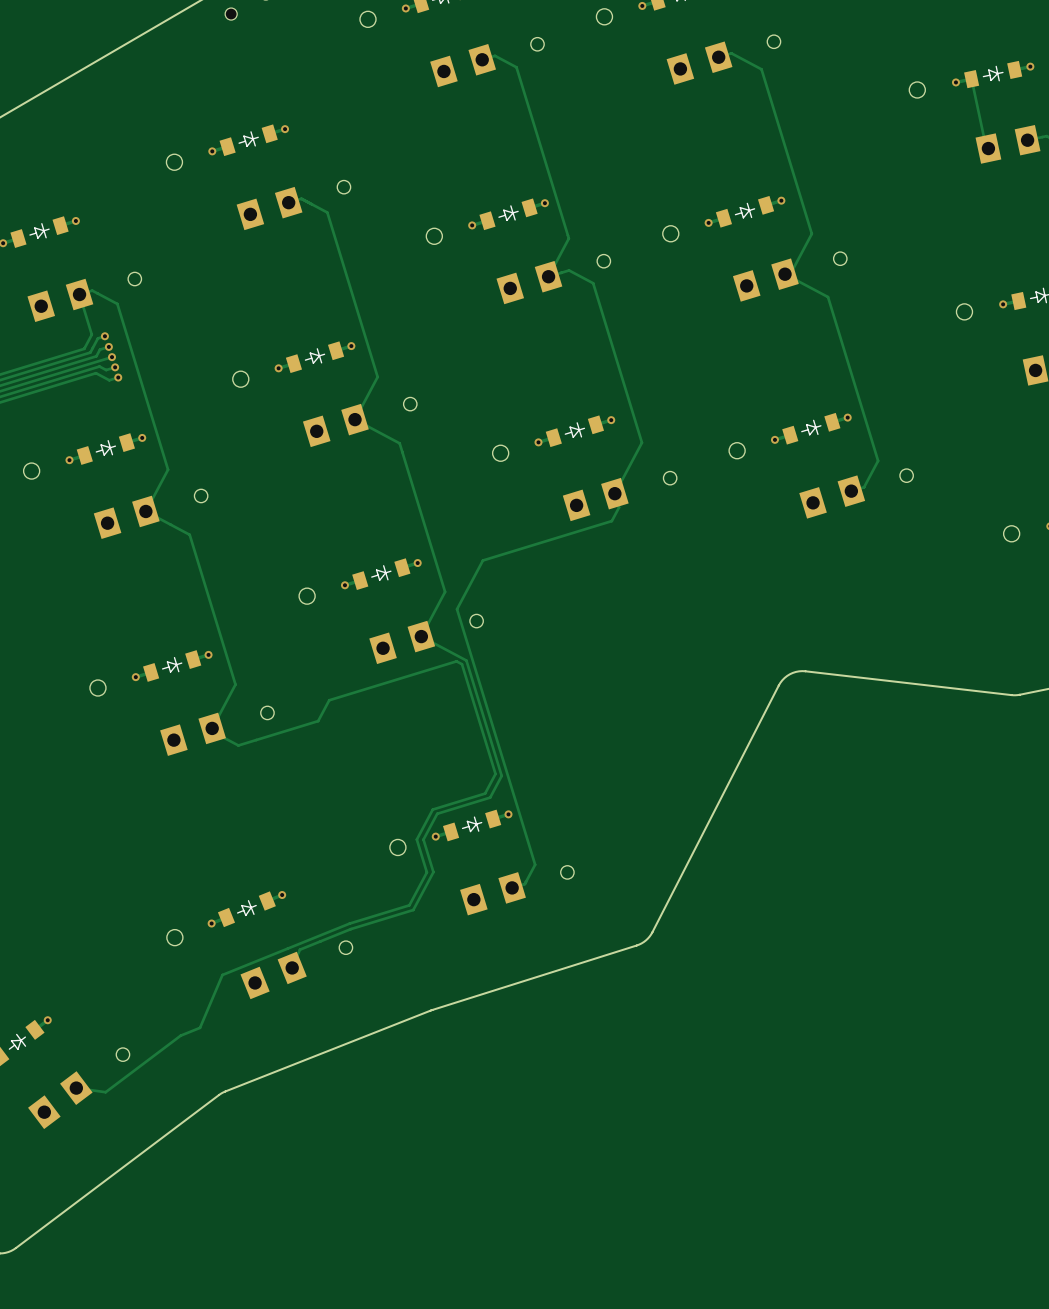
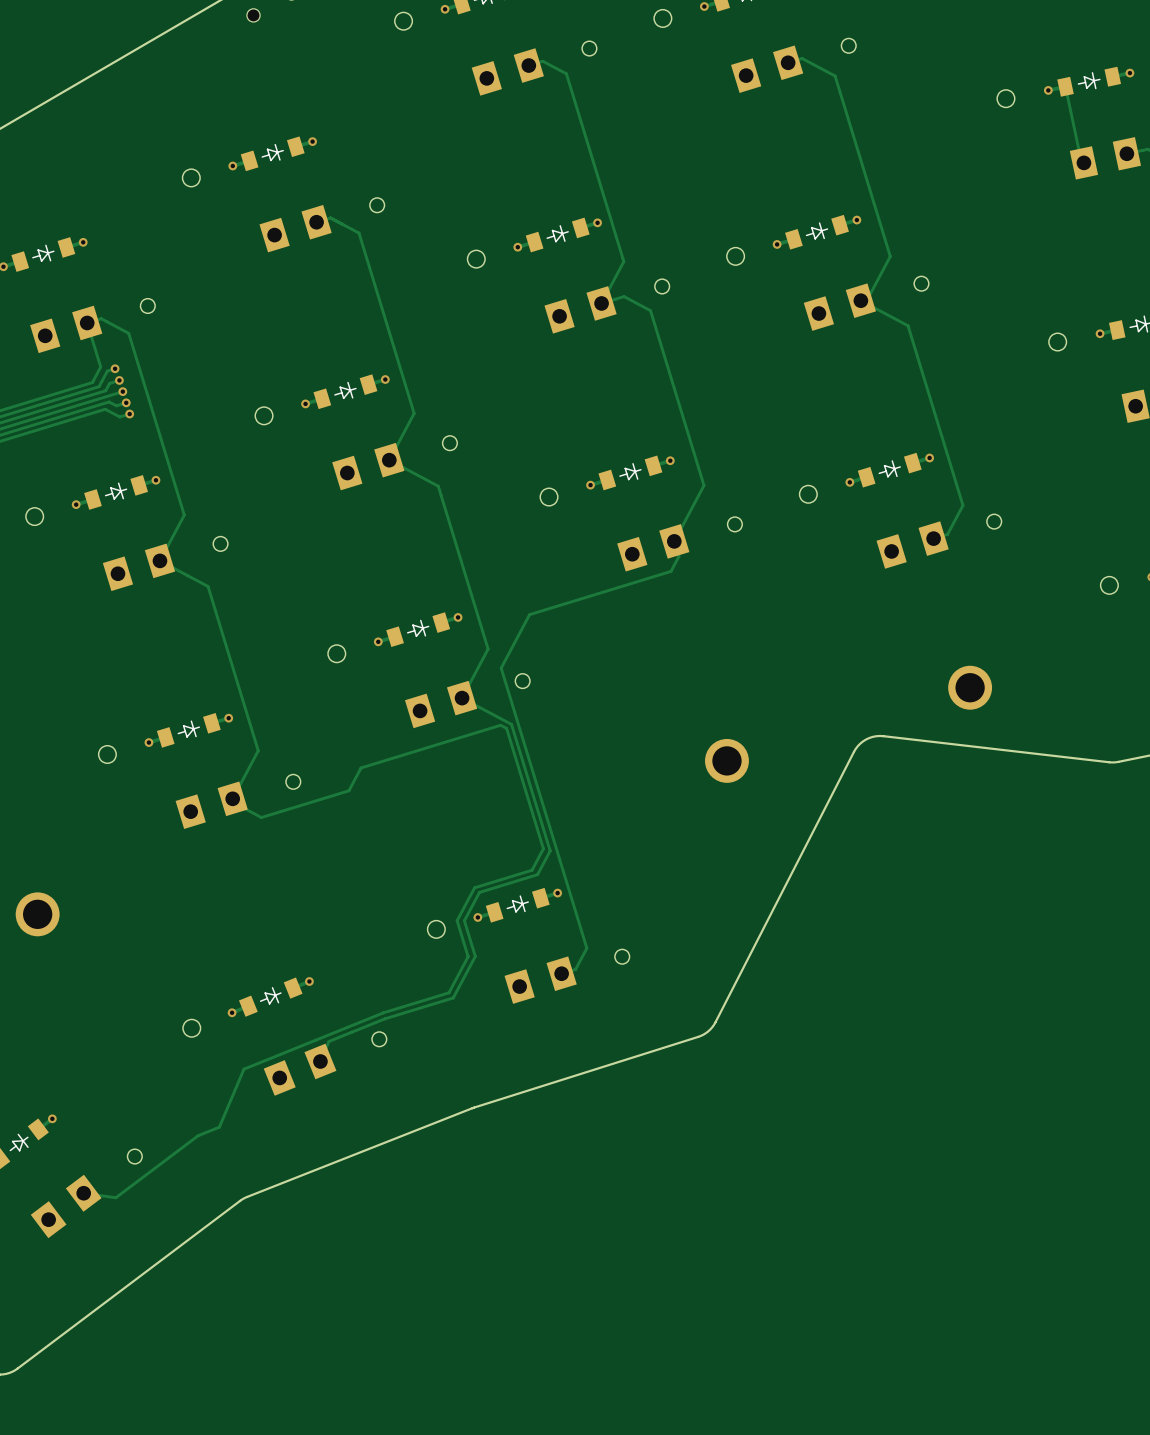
part: none -> (970, 687)
part: none -> (726, 760)
part: none -> (37, 914)

